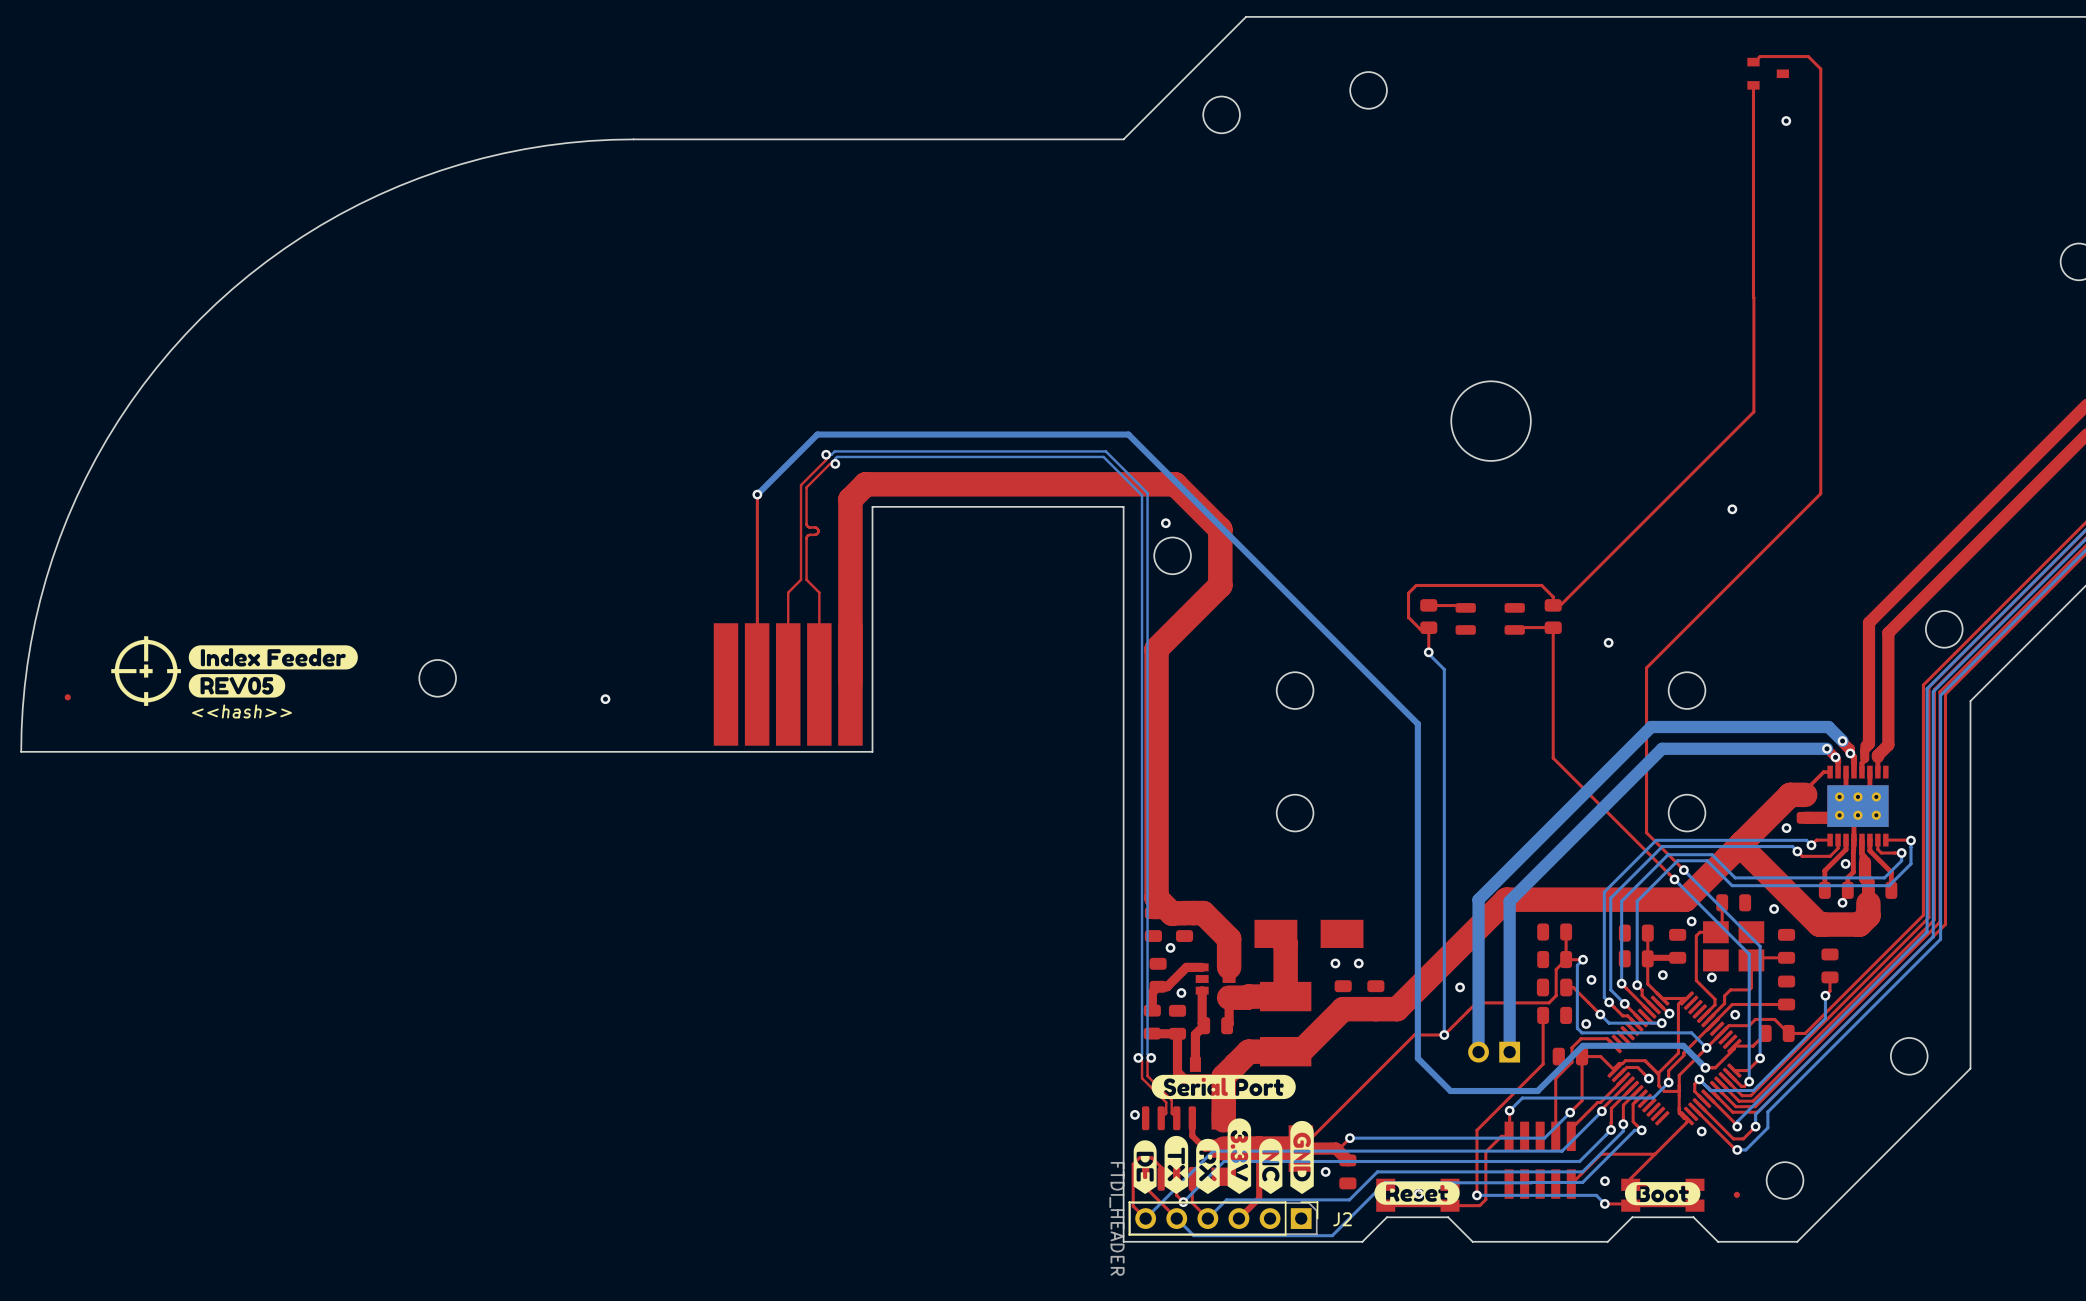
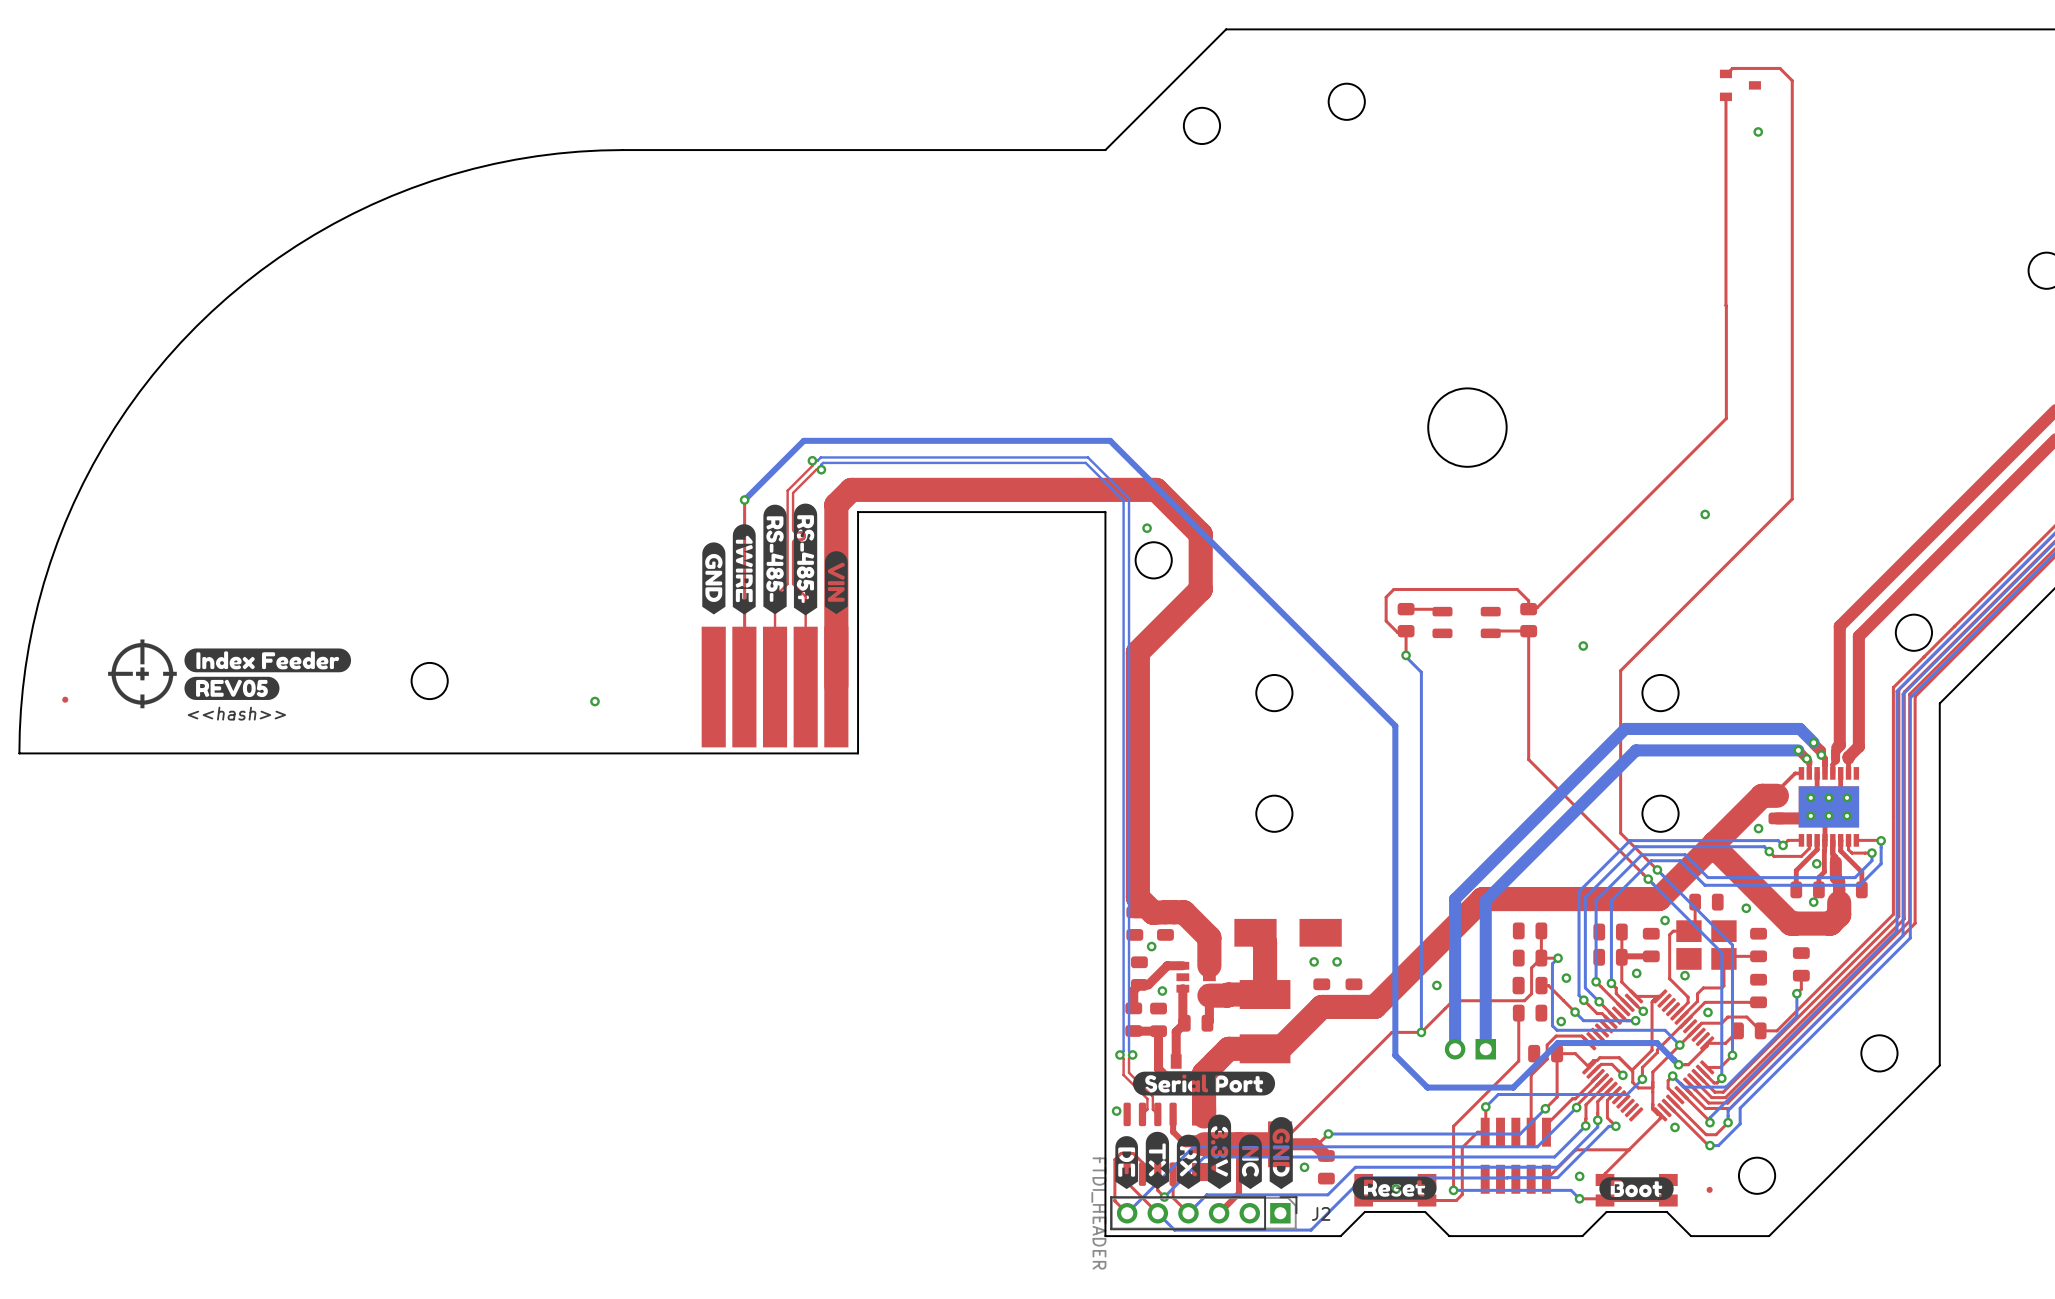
drawing: none -> [702, 503, 848, 616]

